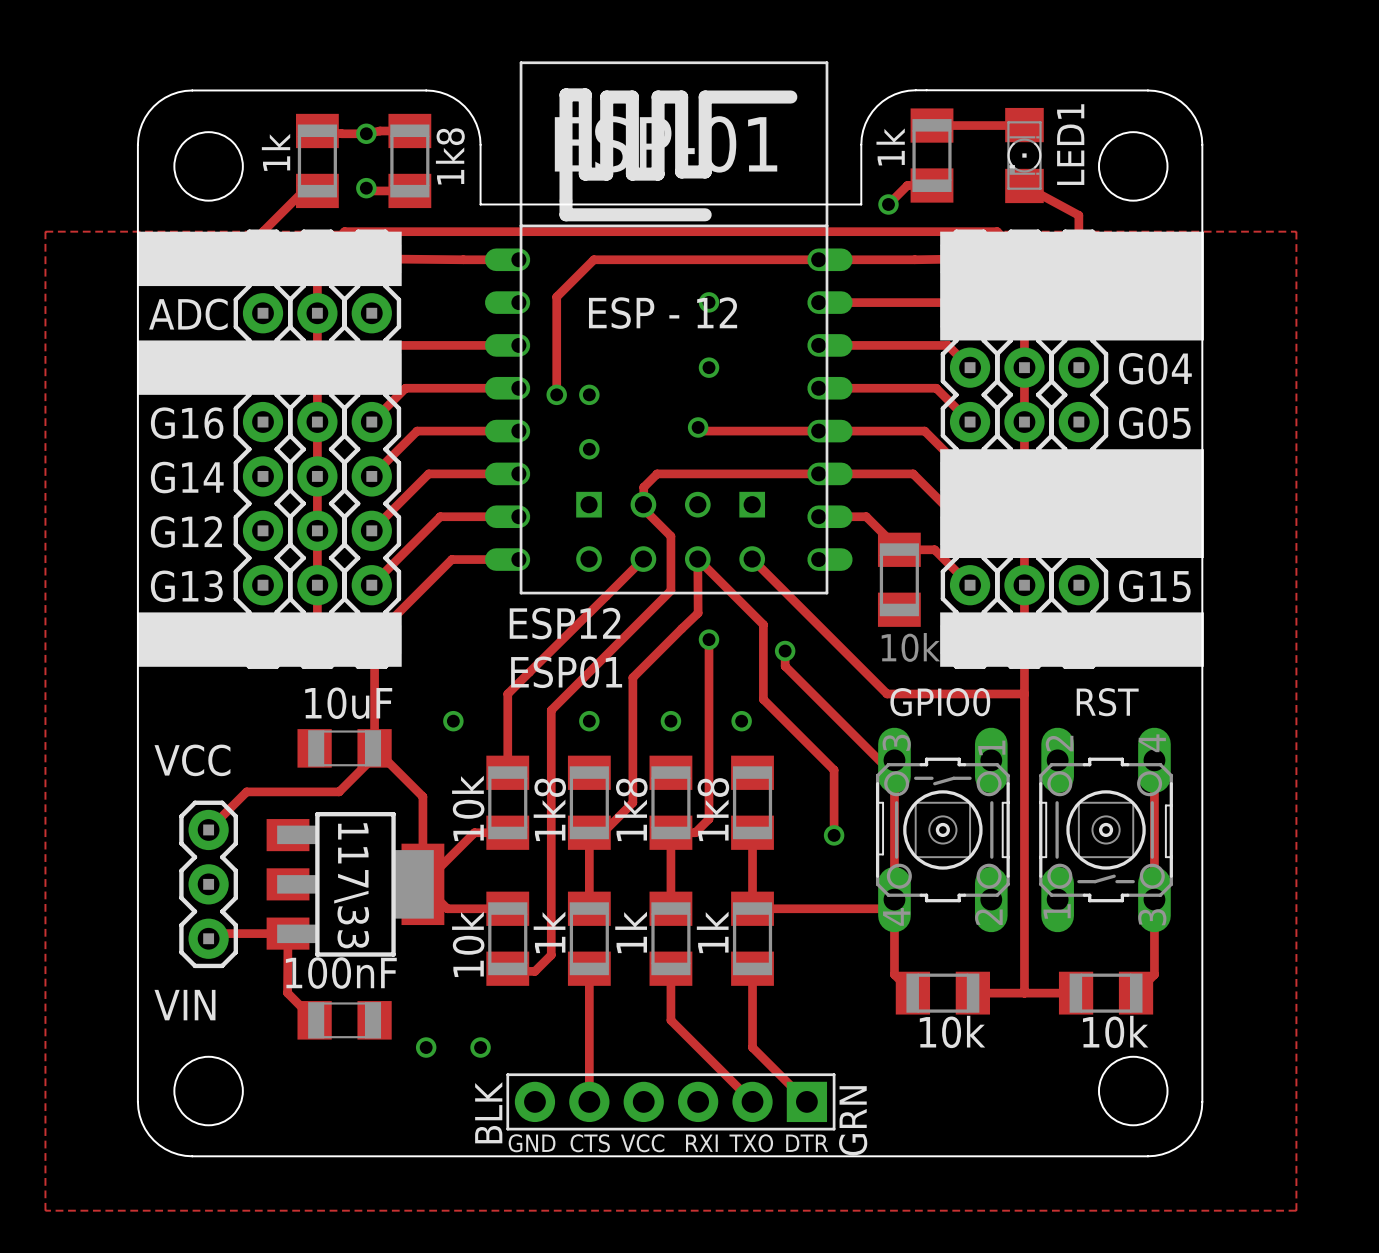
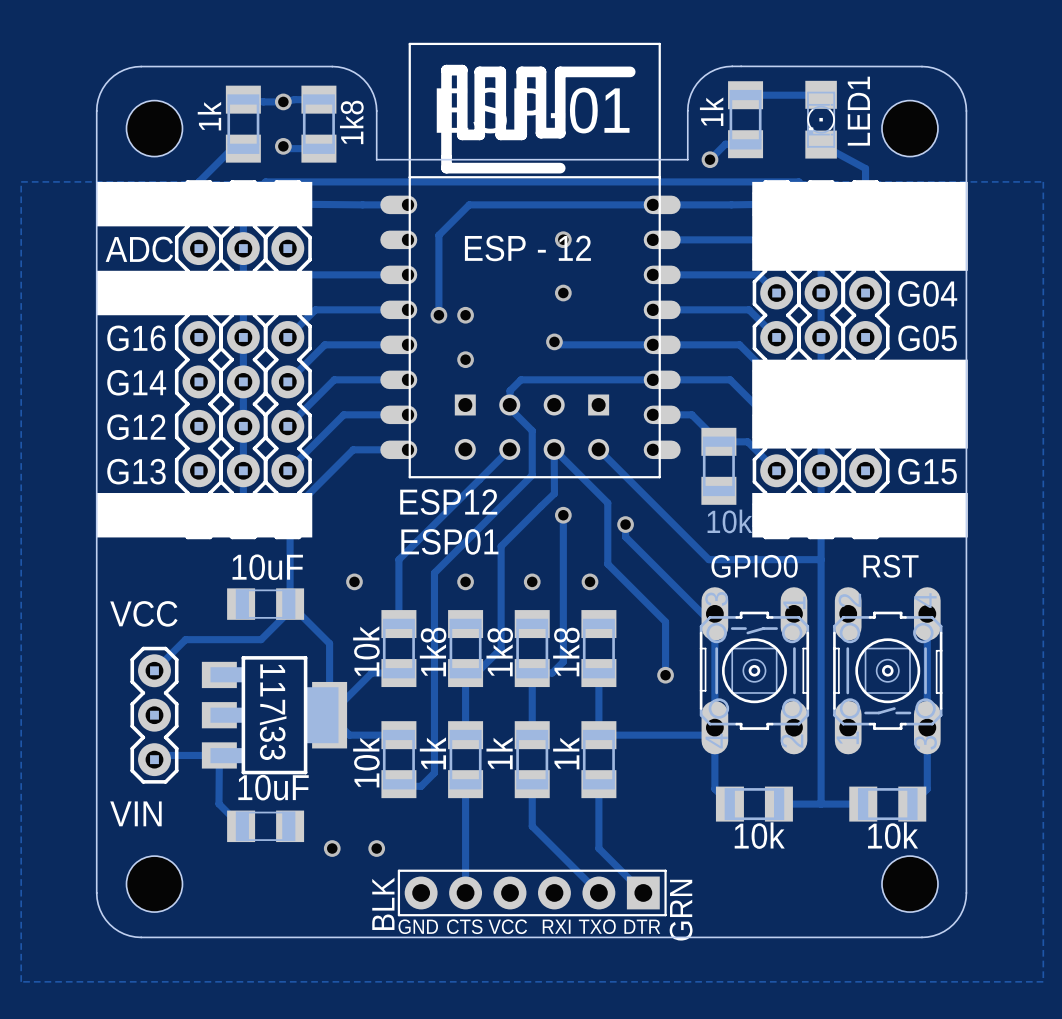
part value: 100nF (341, 973) -> 10uF (273, 787)

